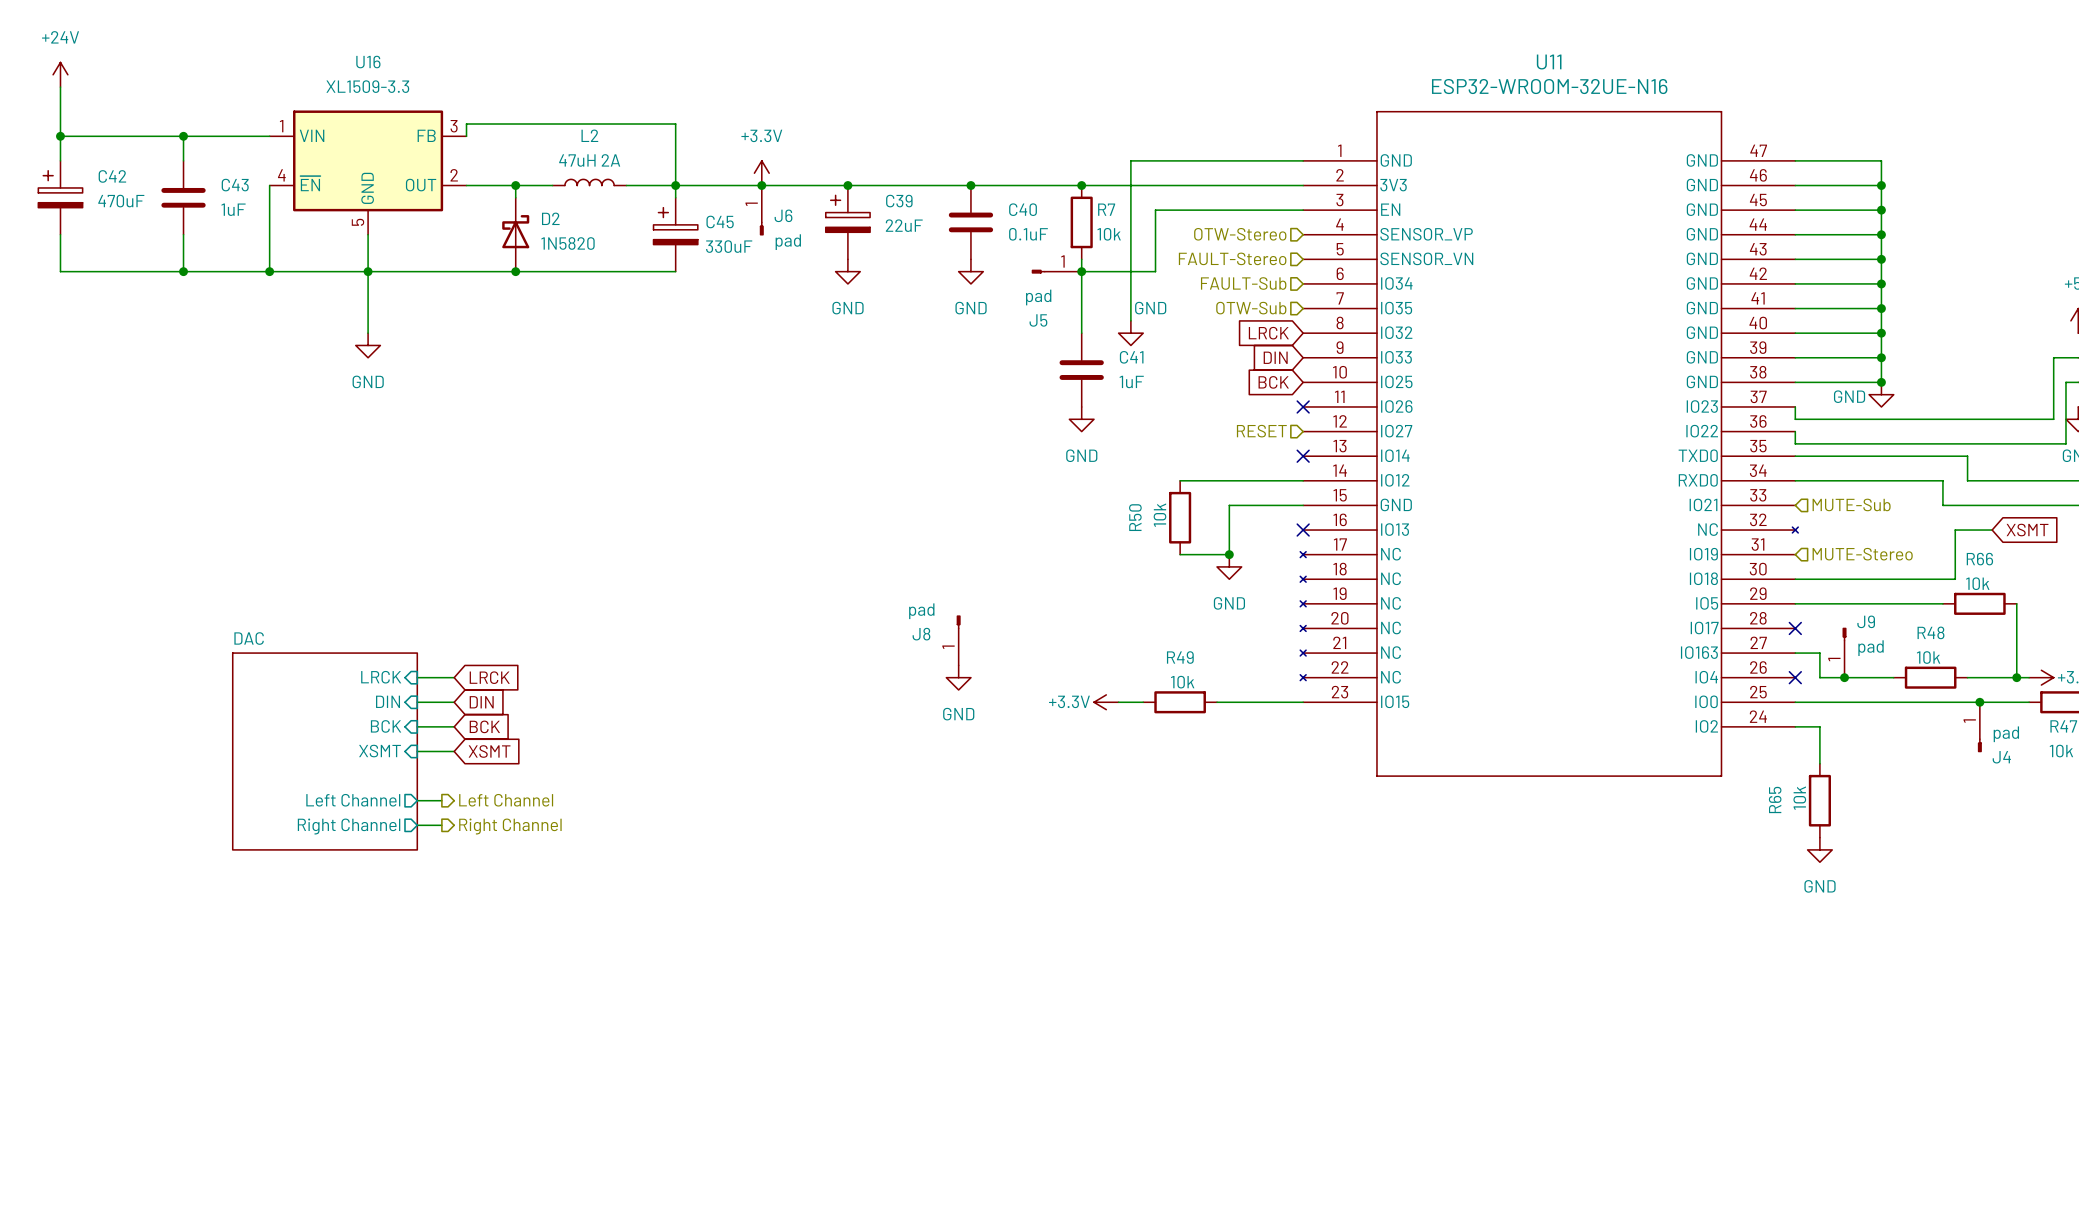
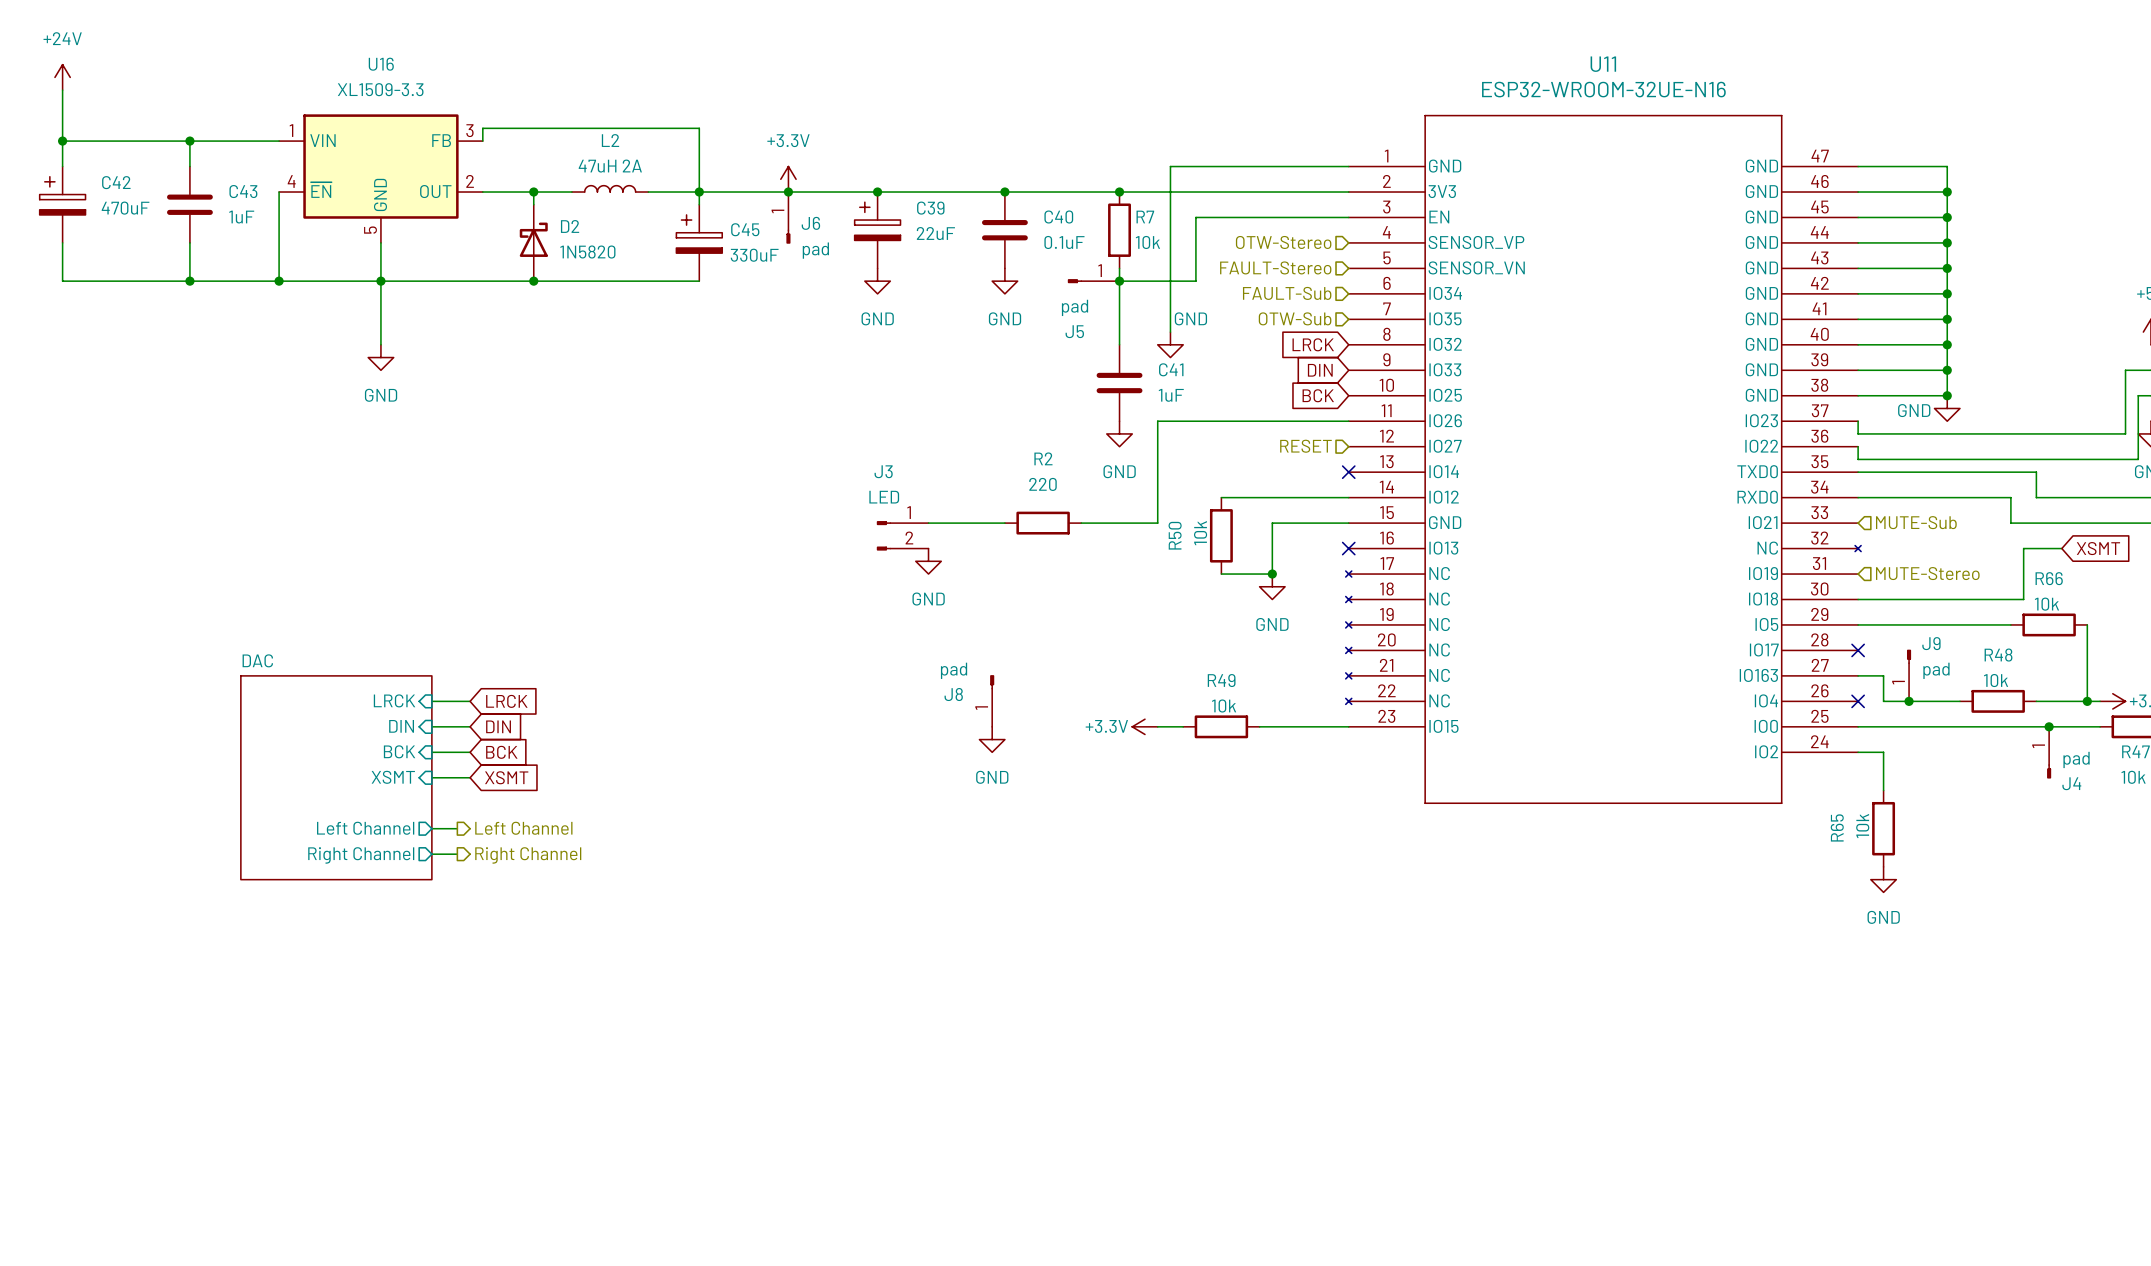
wire: none -> (1348, 421) (1157, 421) (1157, 523) (1081, 523)
no-connect mark: (1303, 406) -> none
wire: none -> (928, 523) (1004, 523)
R2: none -> 220 (1043, 523)
J3: none -> LED (902, 535)
power symbol: none -> GND (928, 561)
J8 position: (958, 640) -> (992, 700)
power symbol position: GND (958, 677) -> GND (992, 739)

